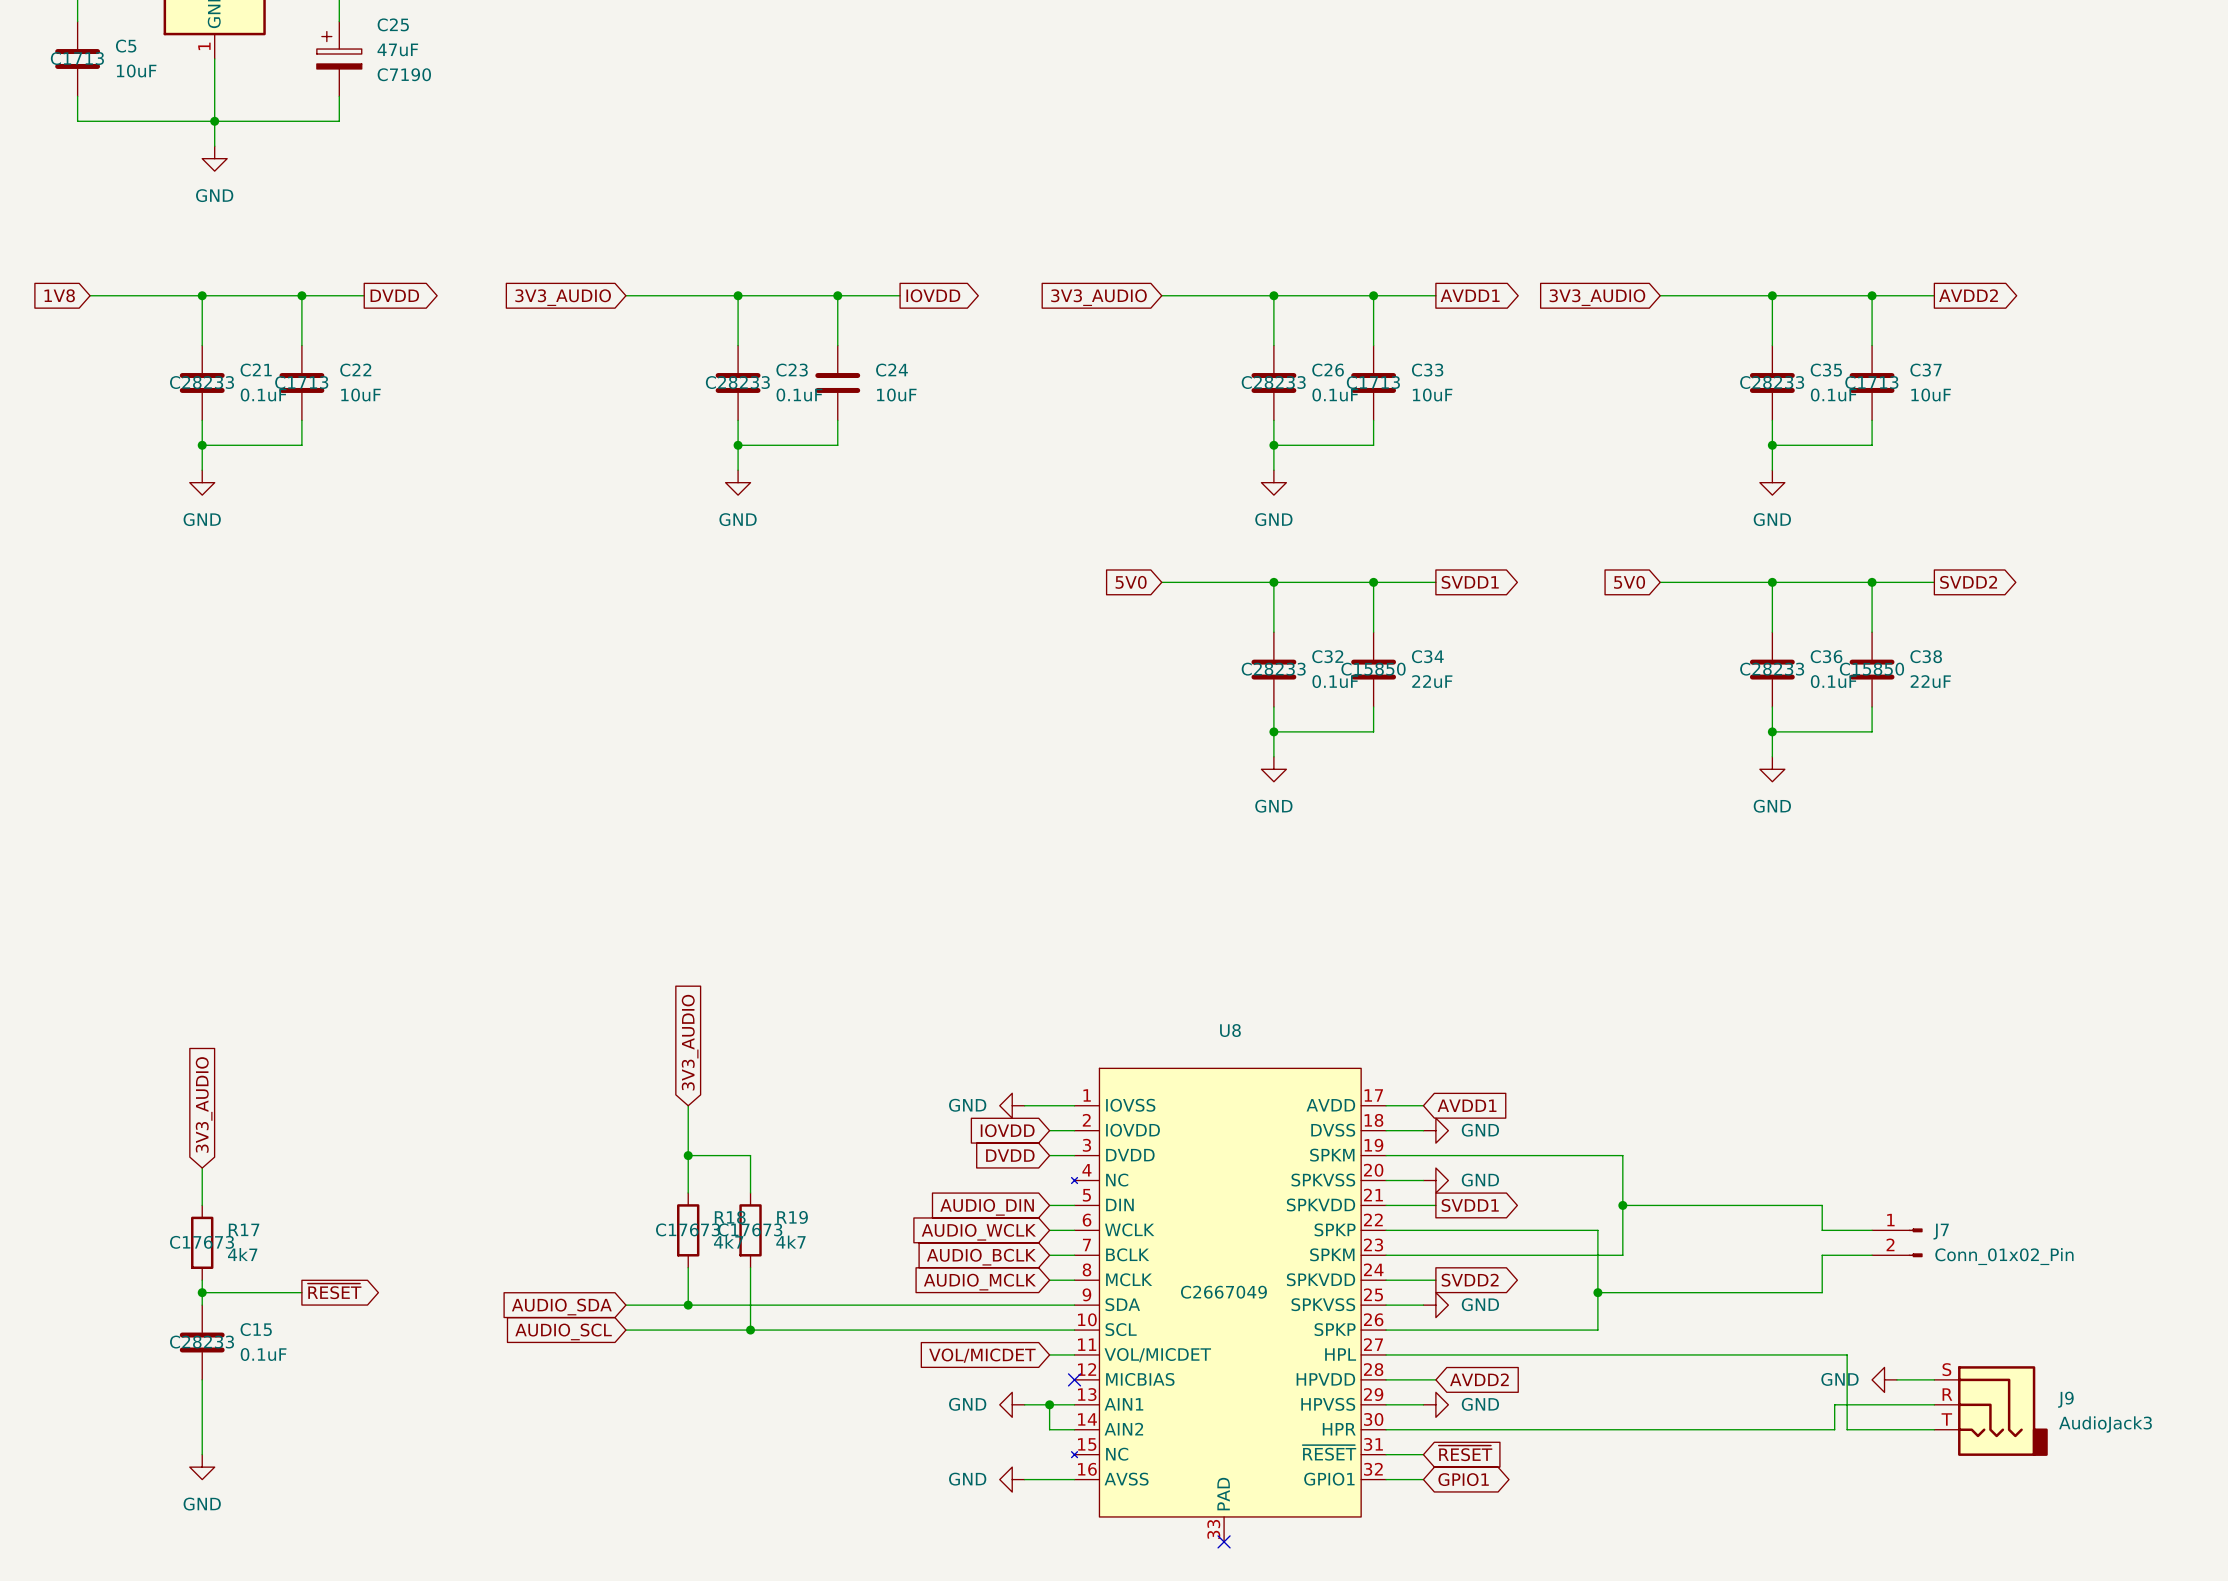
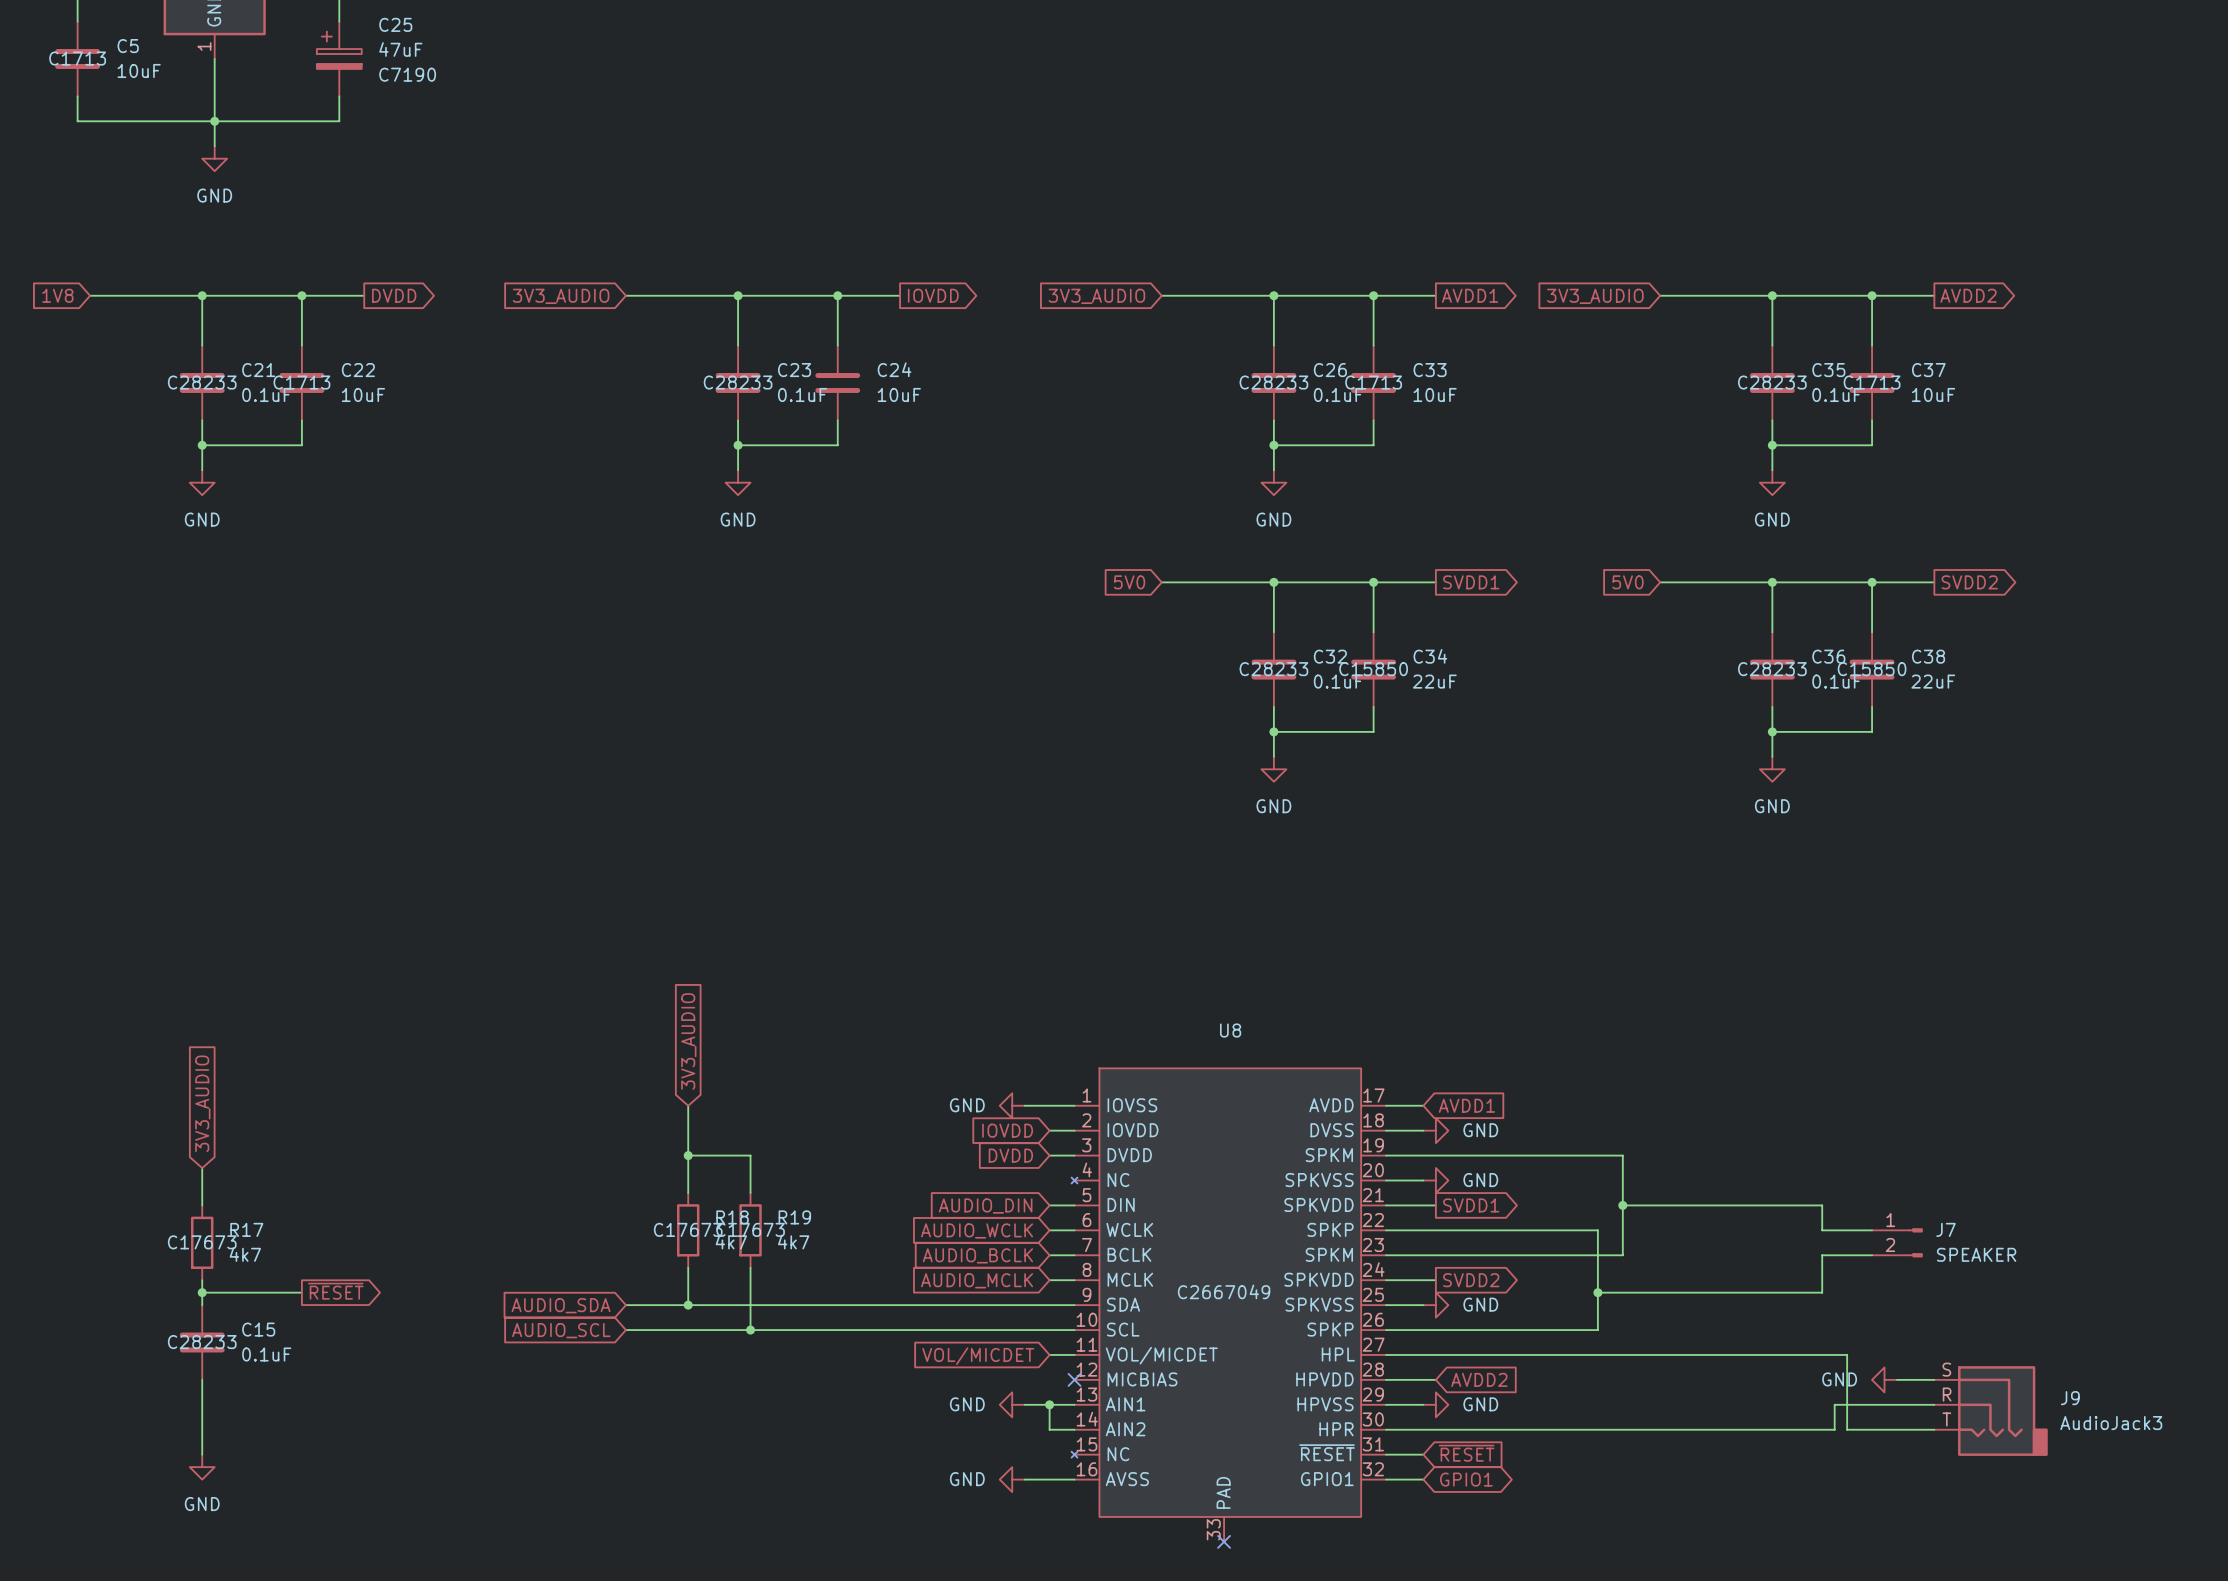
J7 value: Conn_01x02_Pin (2004, 1256) -> SPEAKER (1976, 1254)

